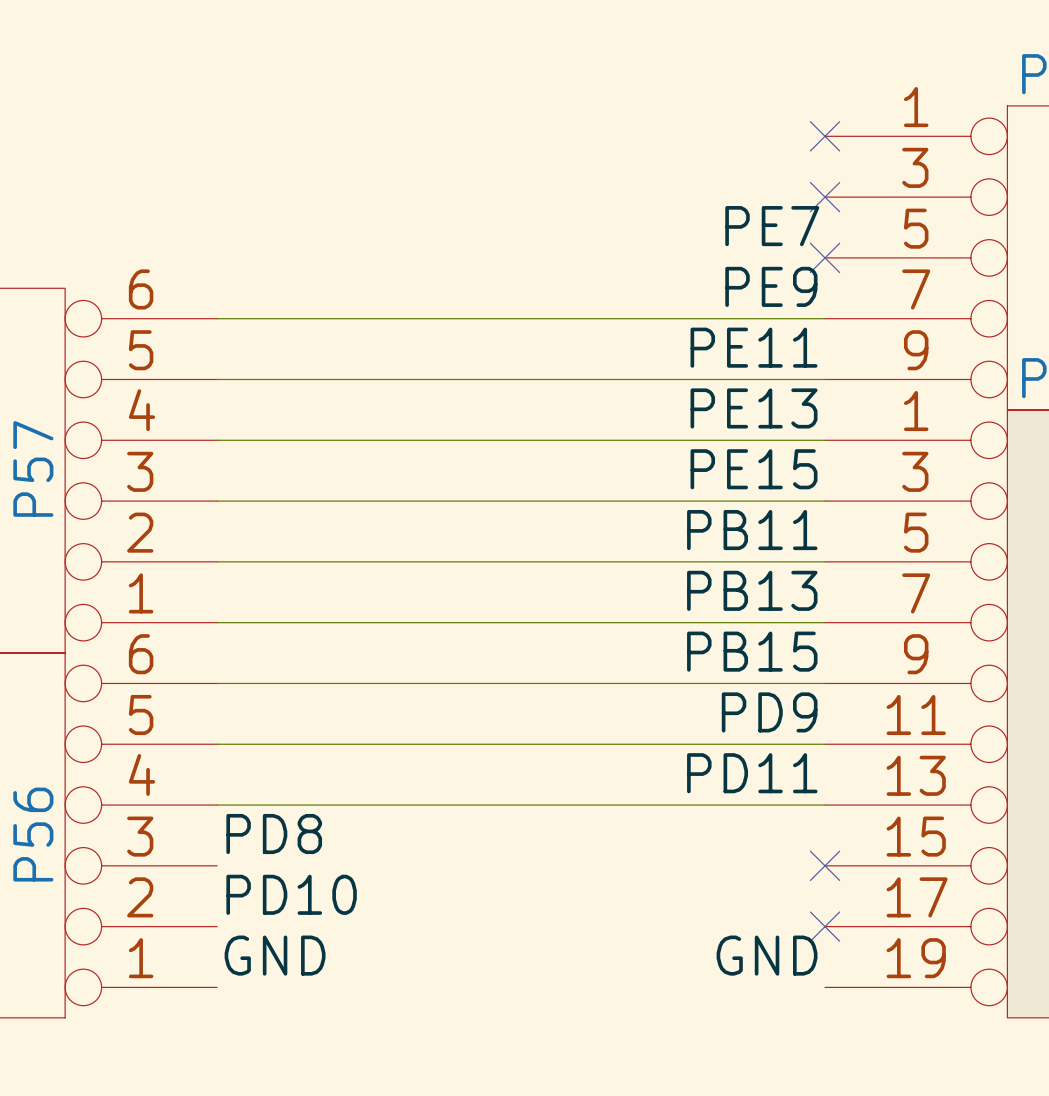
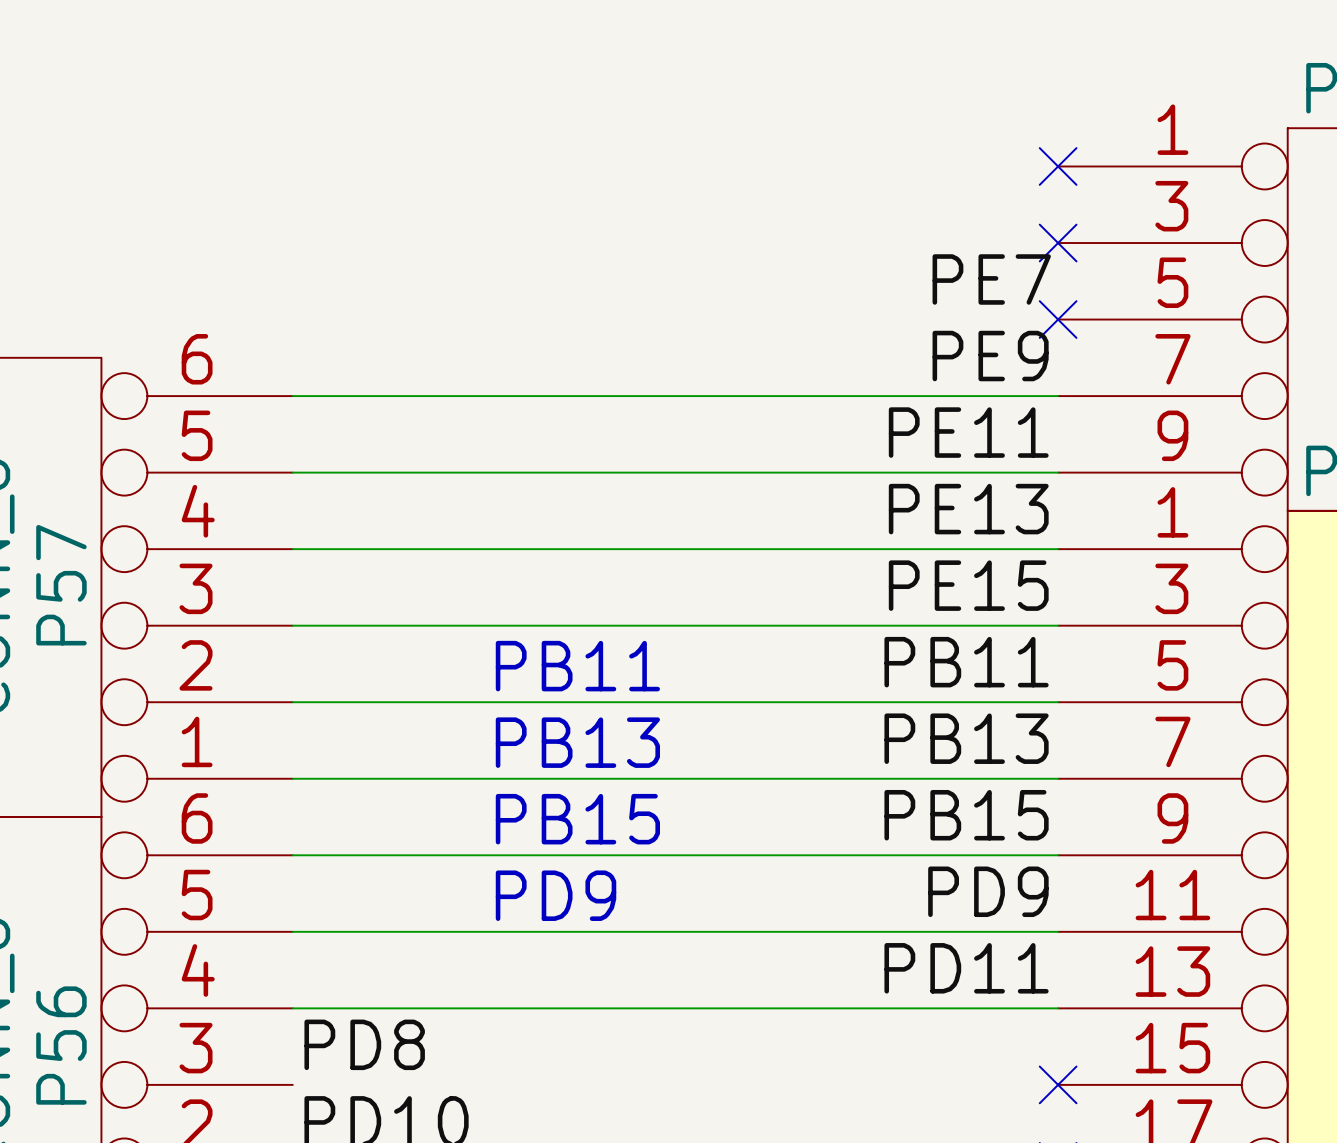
text: none -> PB11 (577, 666)
text: none -> PB13 (577, 742)
text: none -> PB15 (577, 819)
text: none -> PD9 (556, 895)

